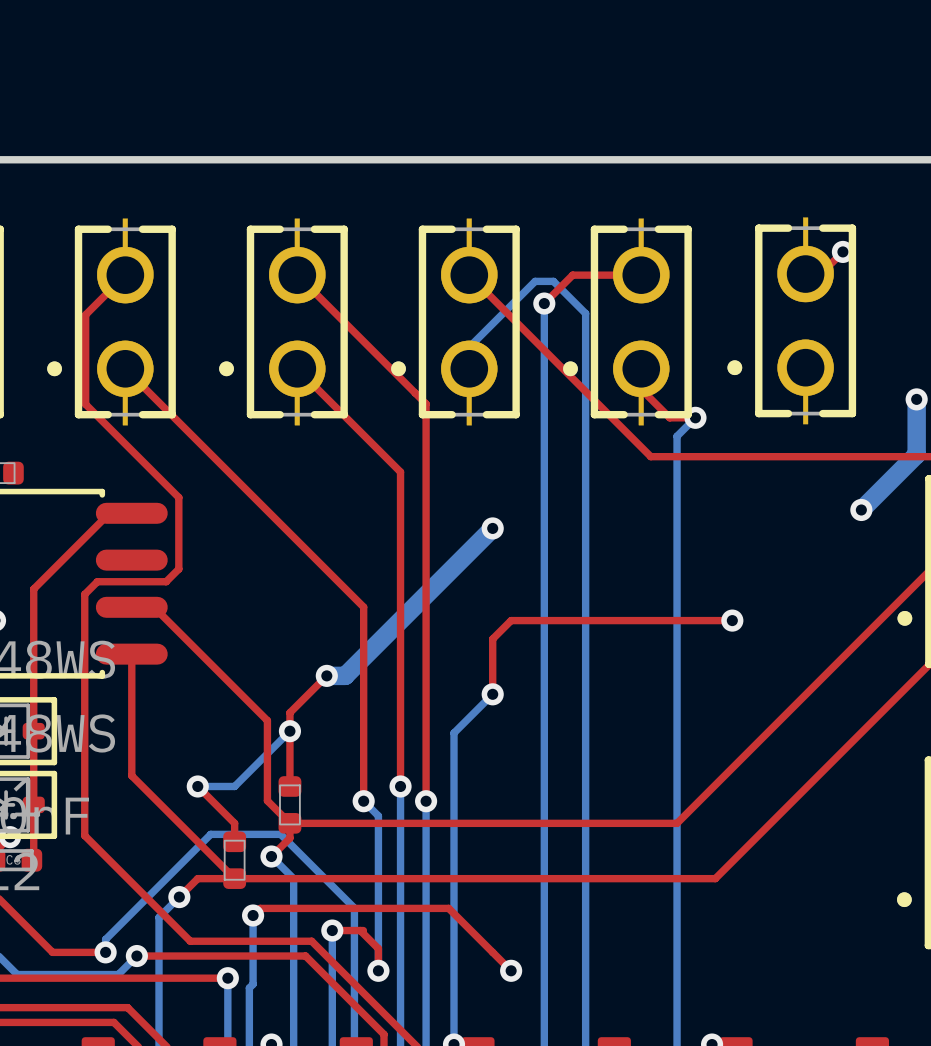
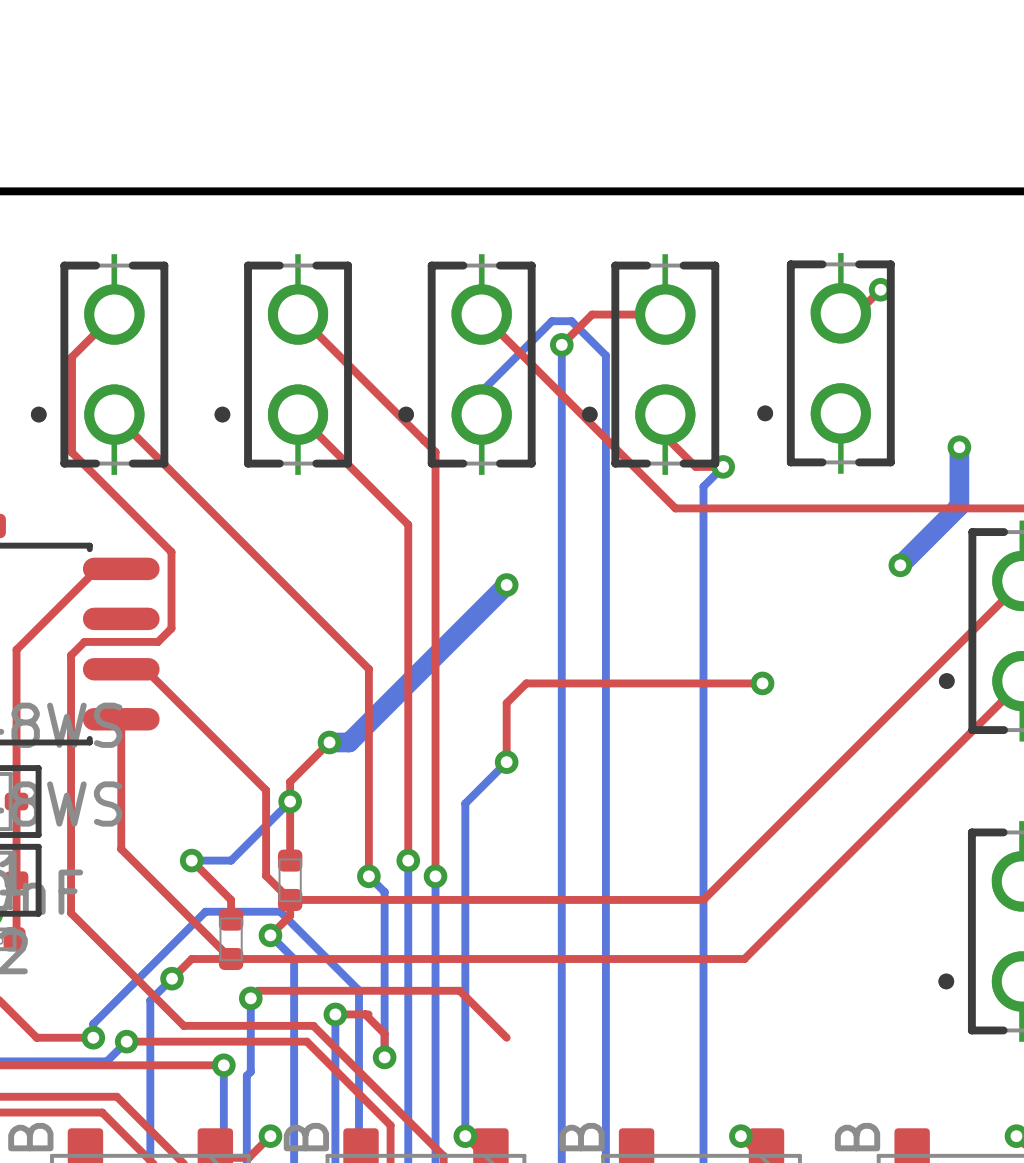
top track: (492, 952) (511, 970) -> none
via: (511, 970) -> none

